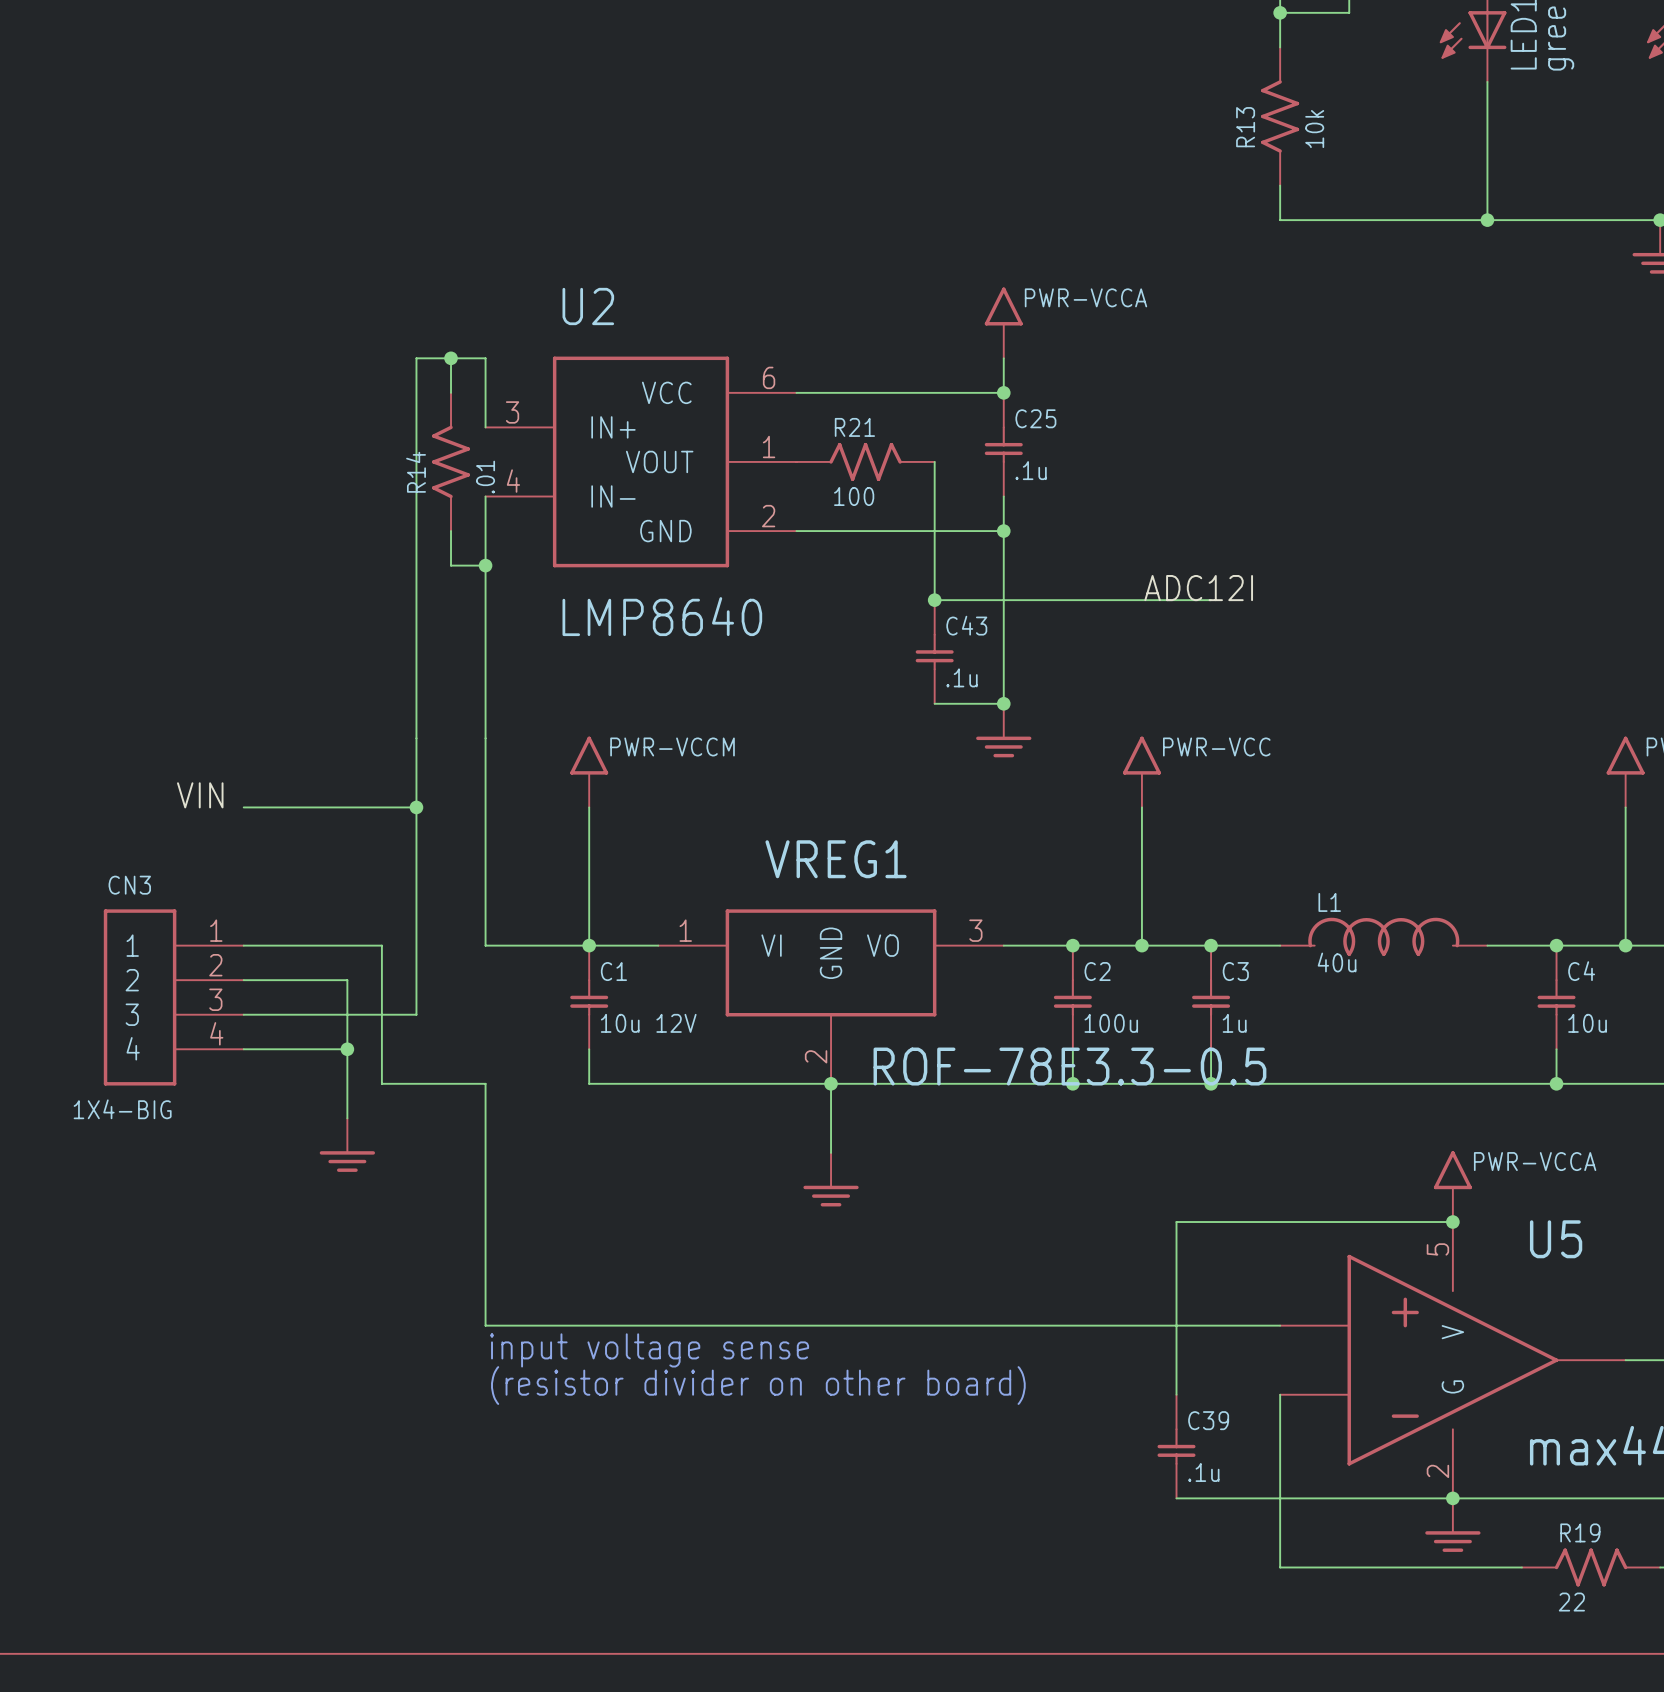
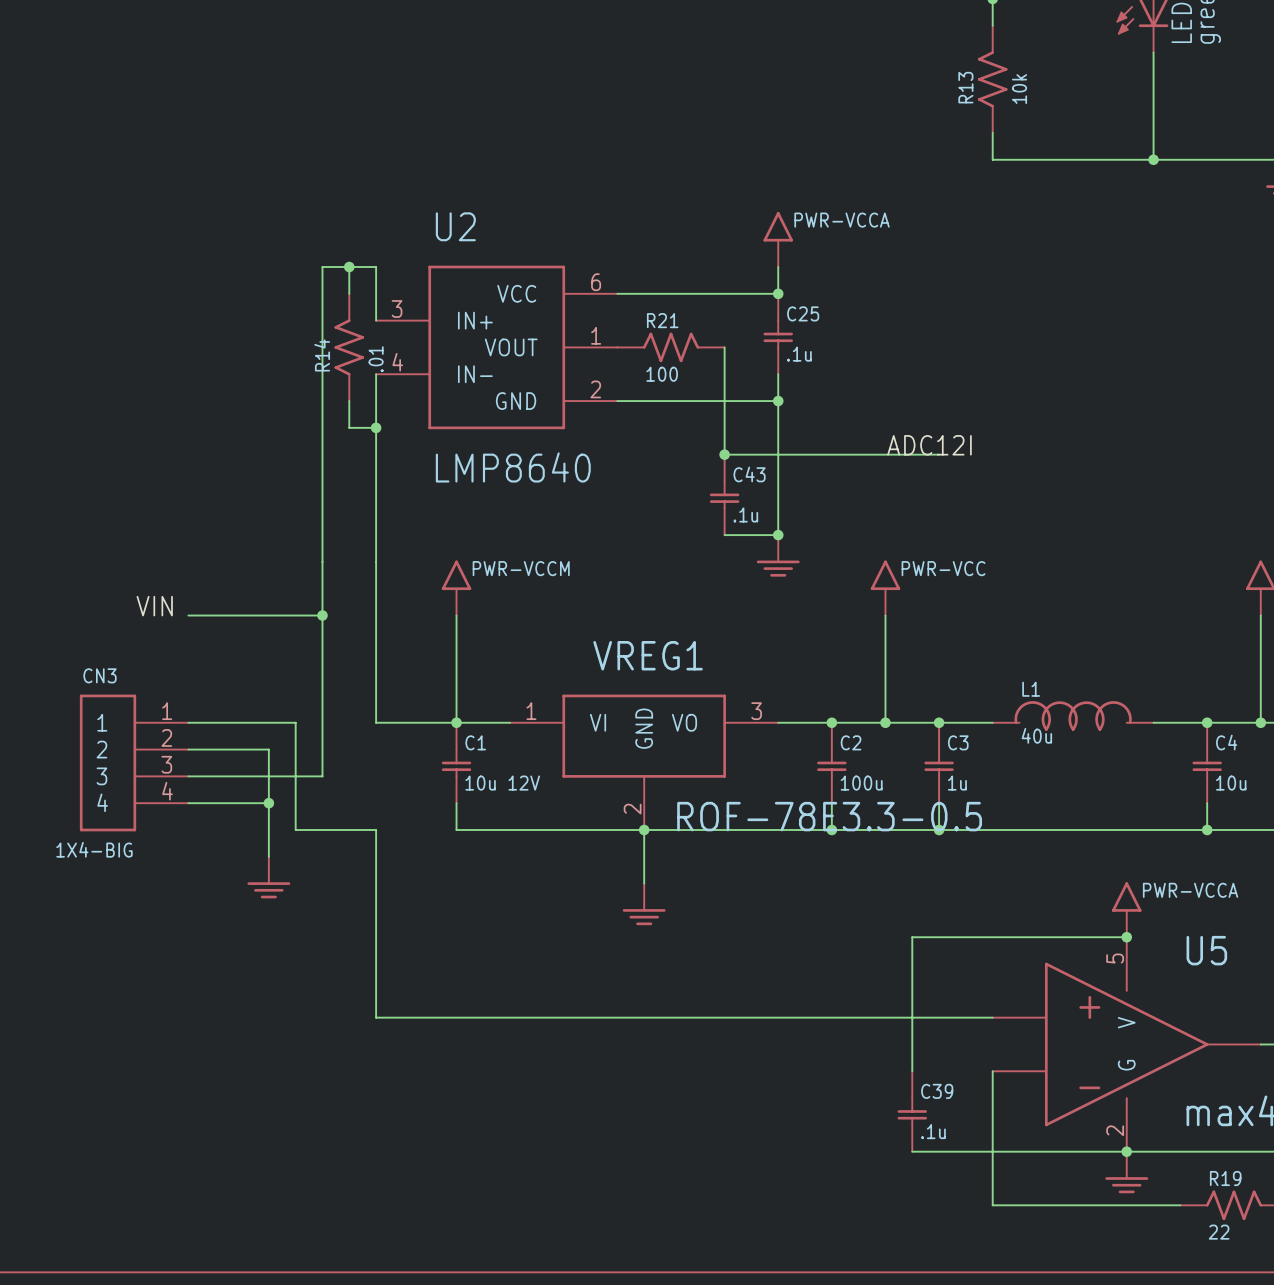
text: input voltage sense (649, 1350) -> none
text: (resistor divider on other board) (758, 1385) -> none

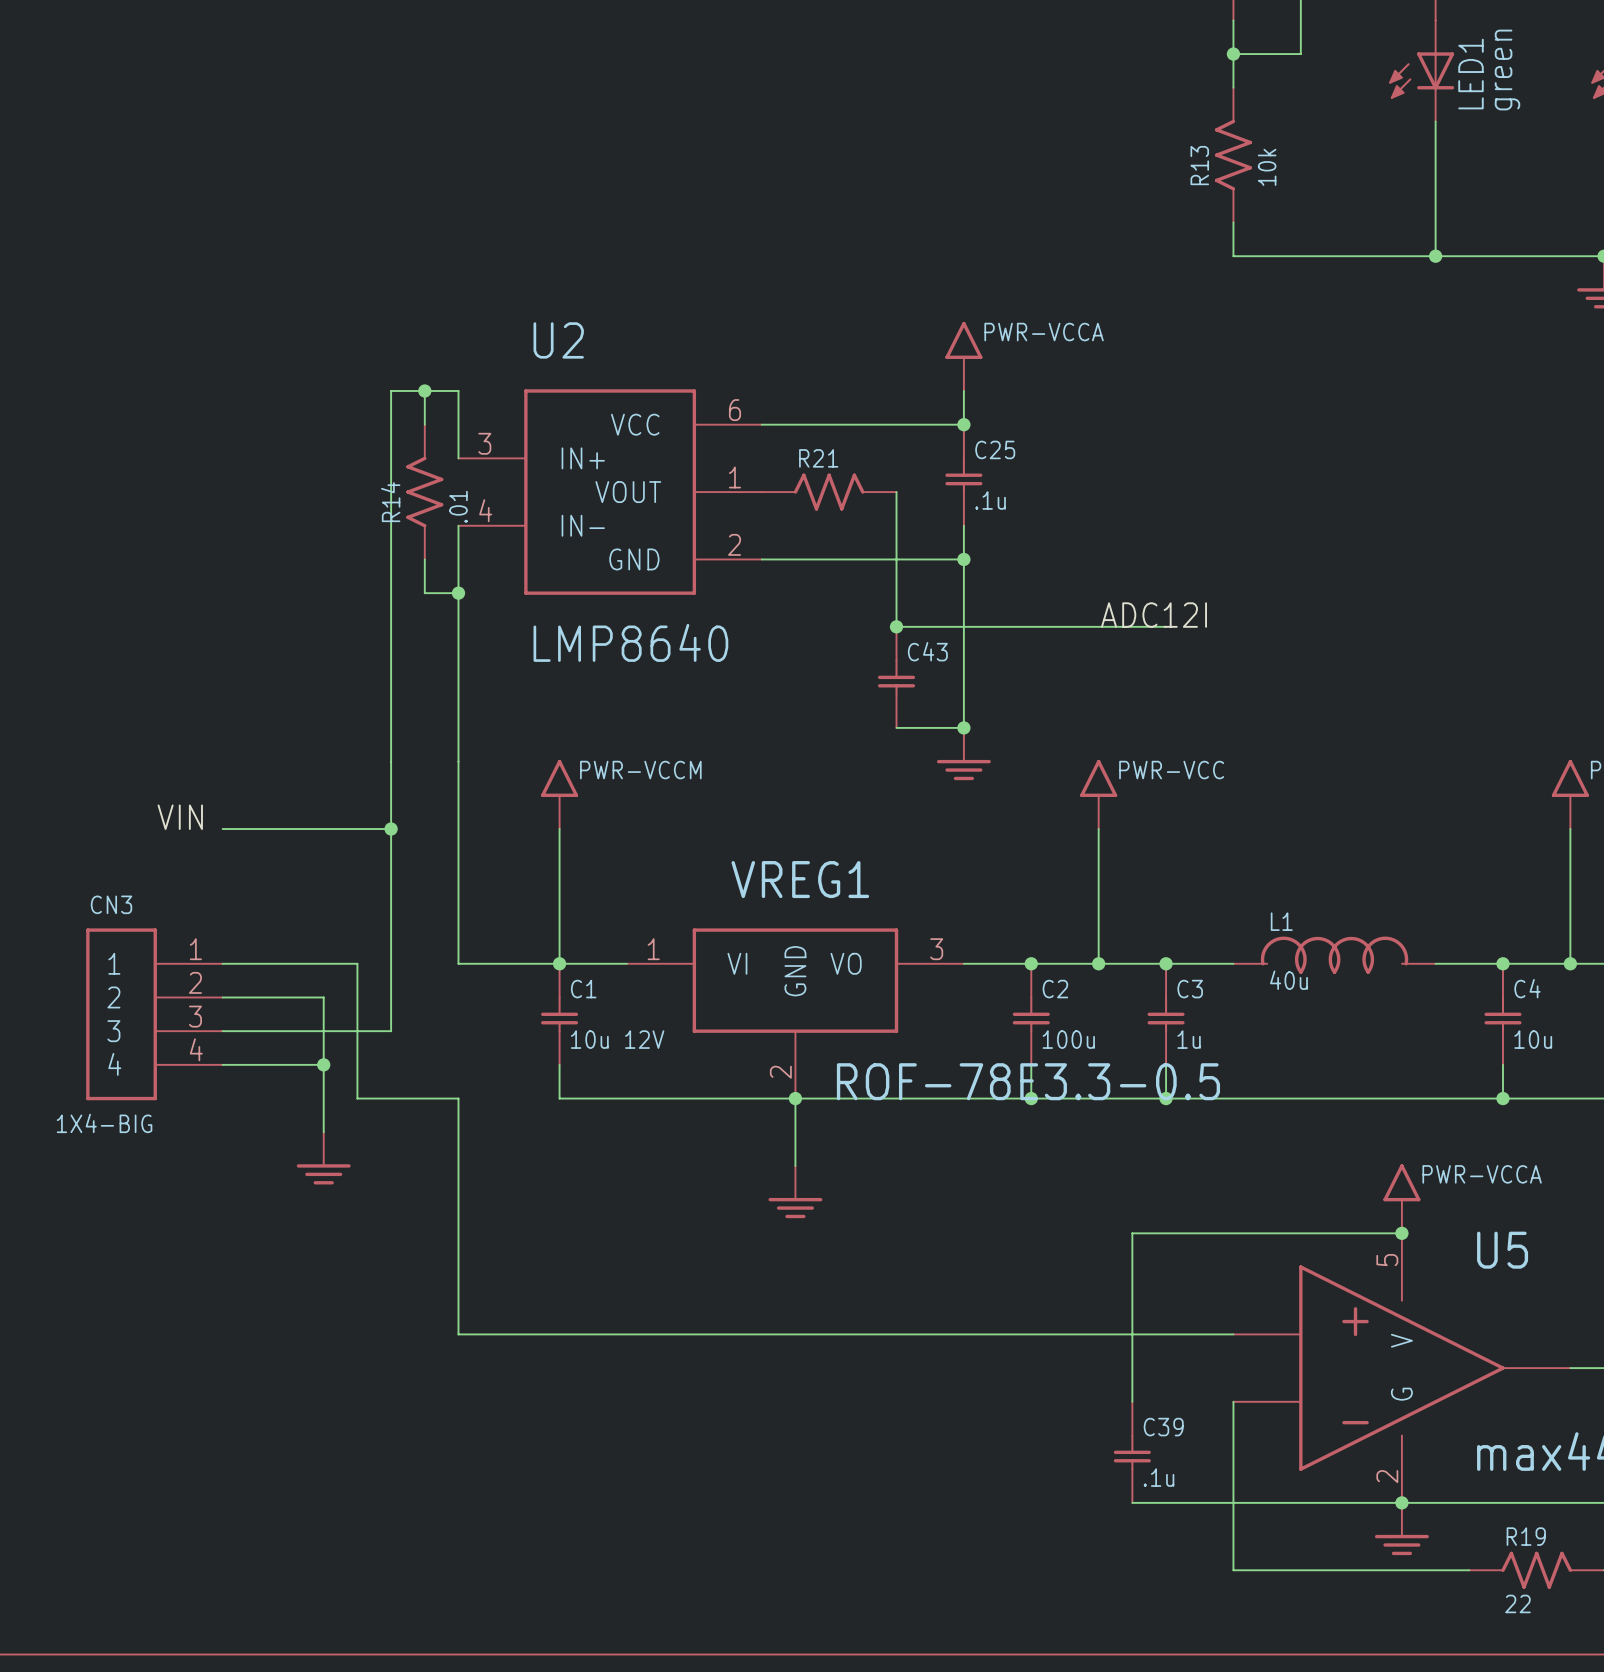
R21 value: 100 (662, 374) -> none
C43 value: .1u (745, 514) -> none

